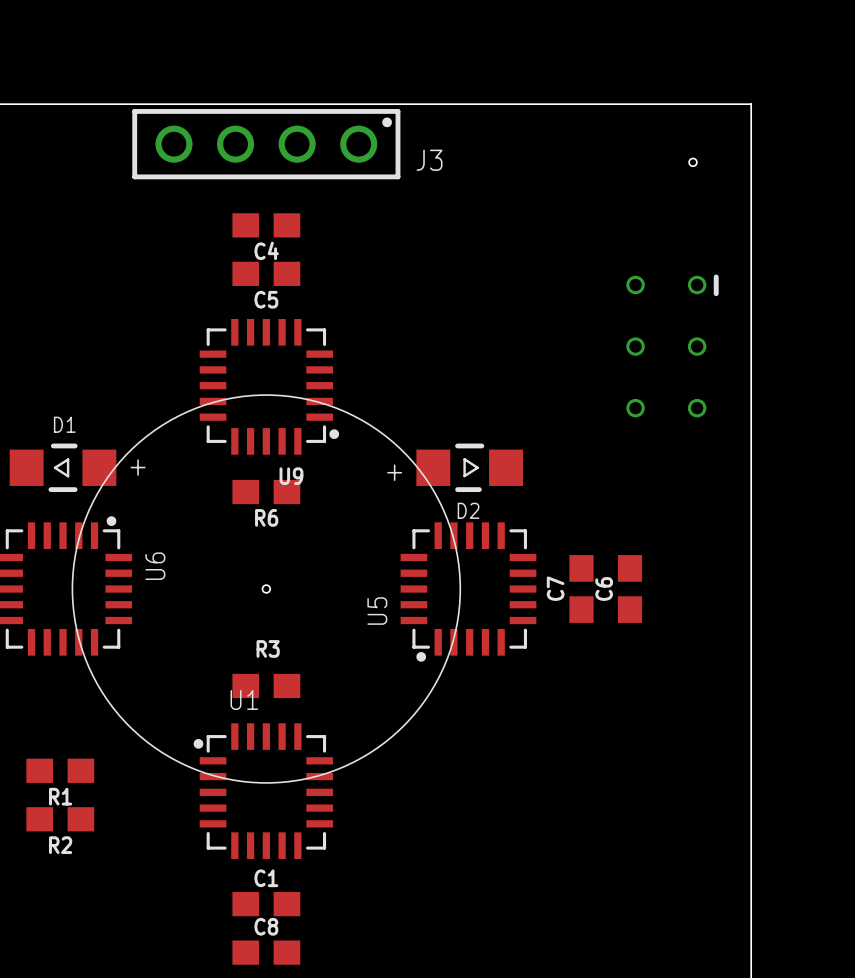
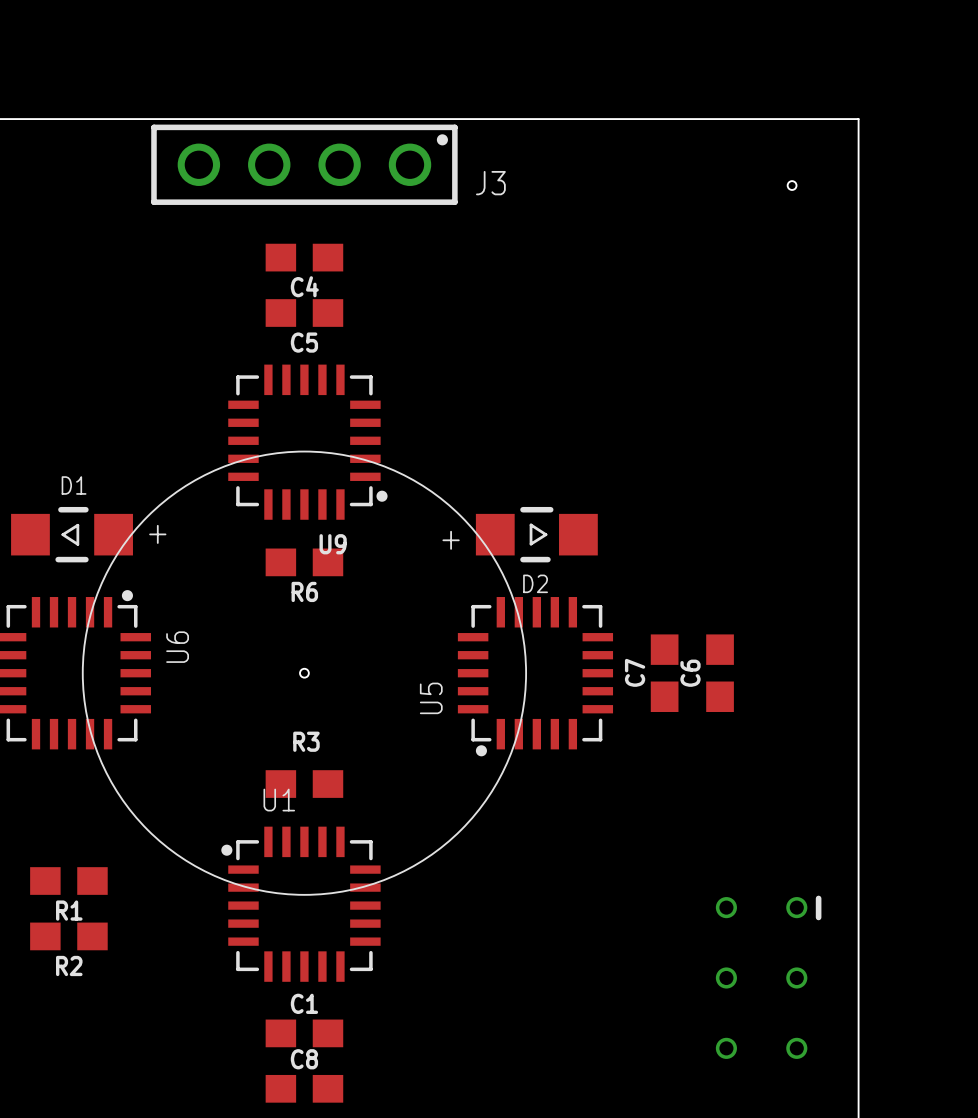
part position: (672, 345) -> (768, 977)

